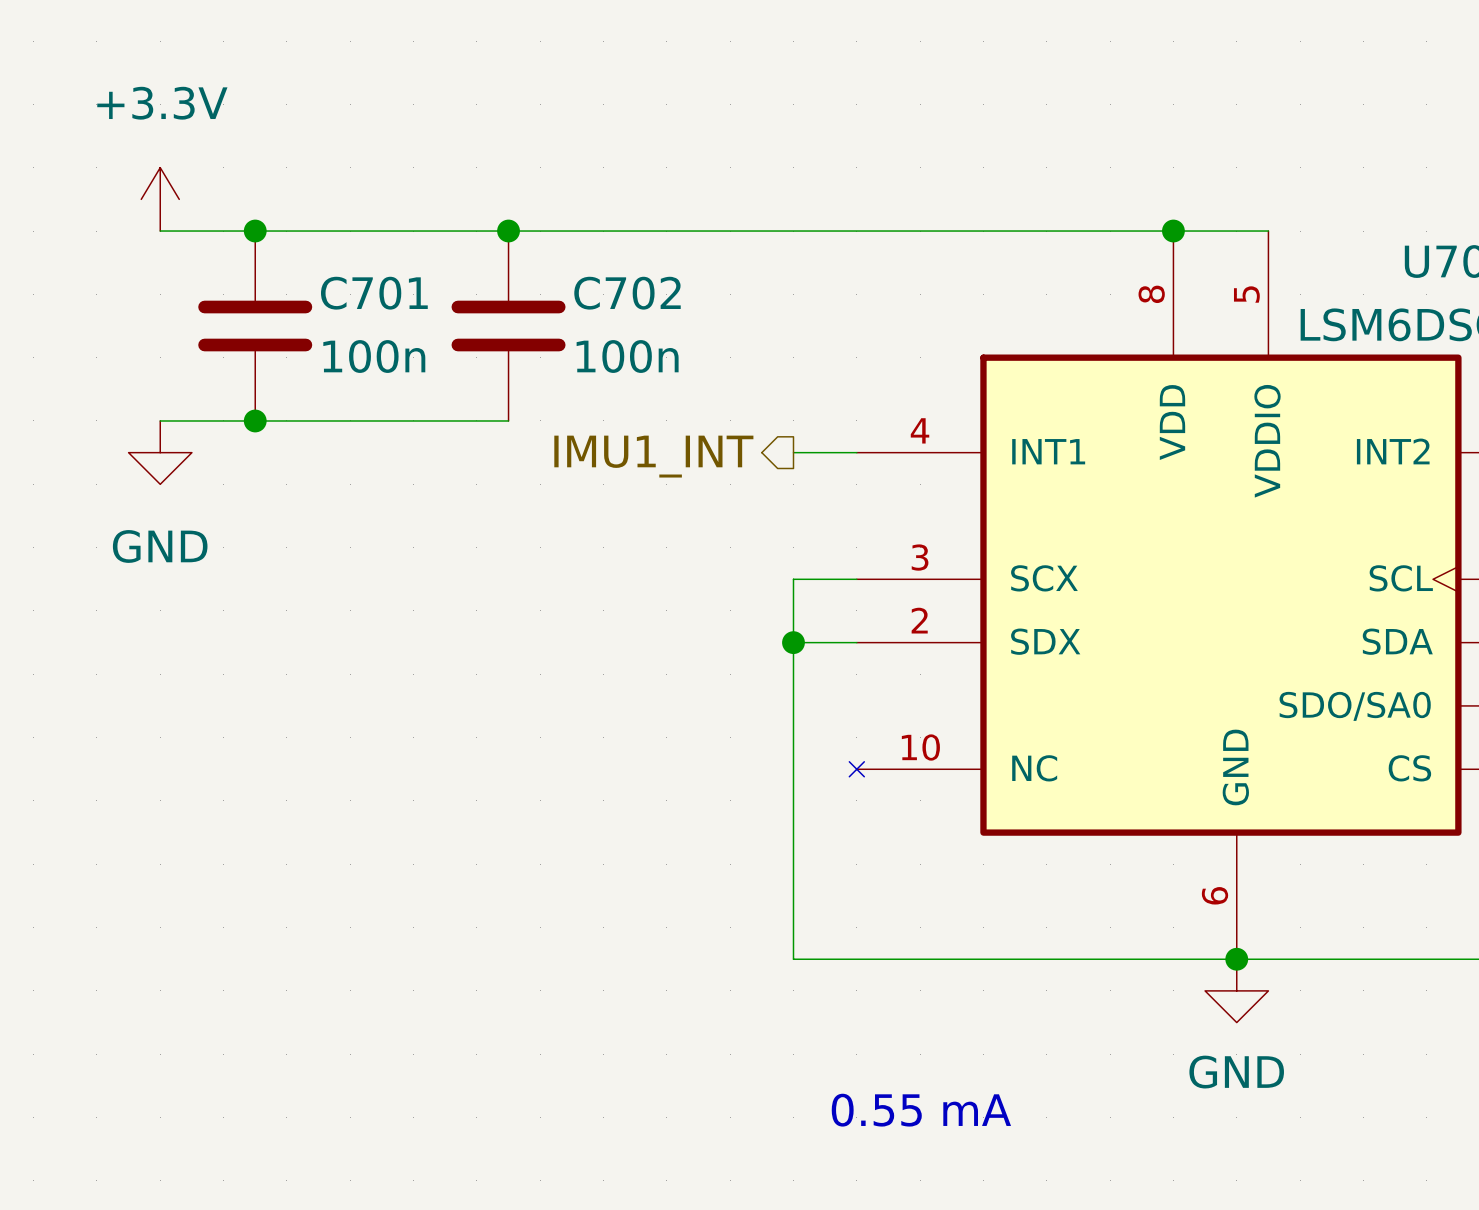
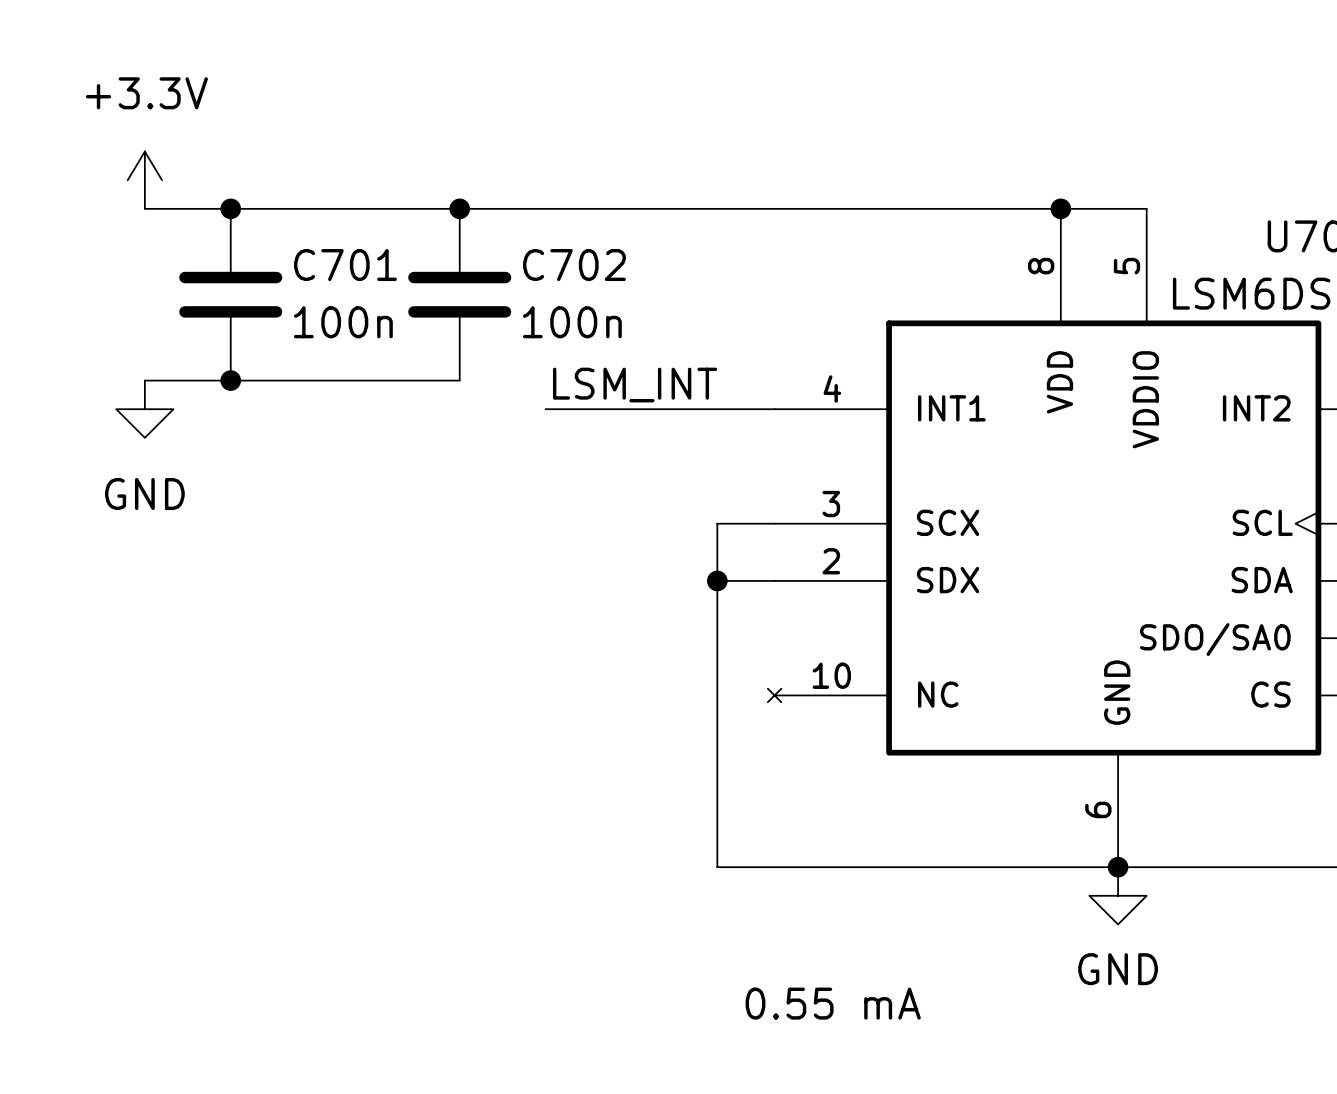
label: none -> LSM_INT (635, 385)
wire: none -> (545, 409) (717, 409)
hierarchical label: IMU1_INT (653, 456) -> none

